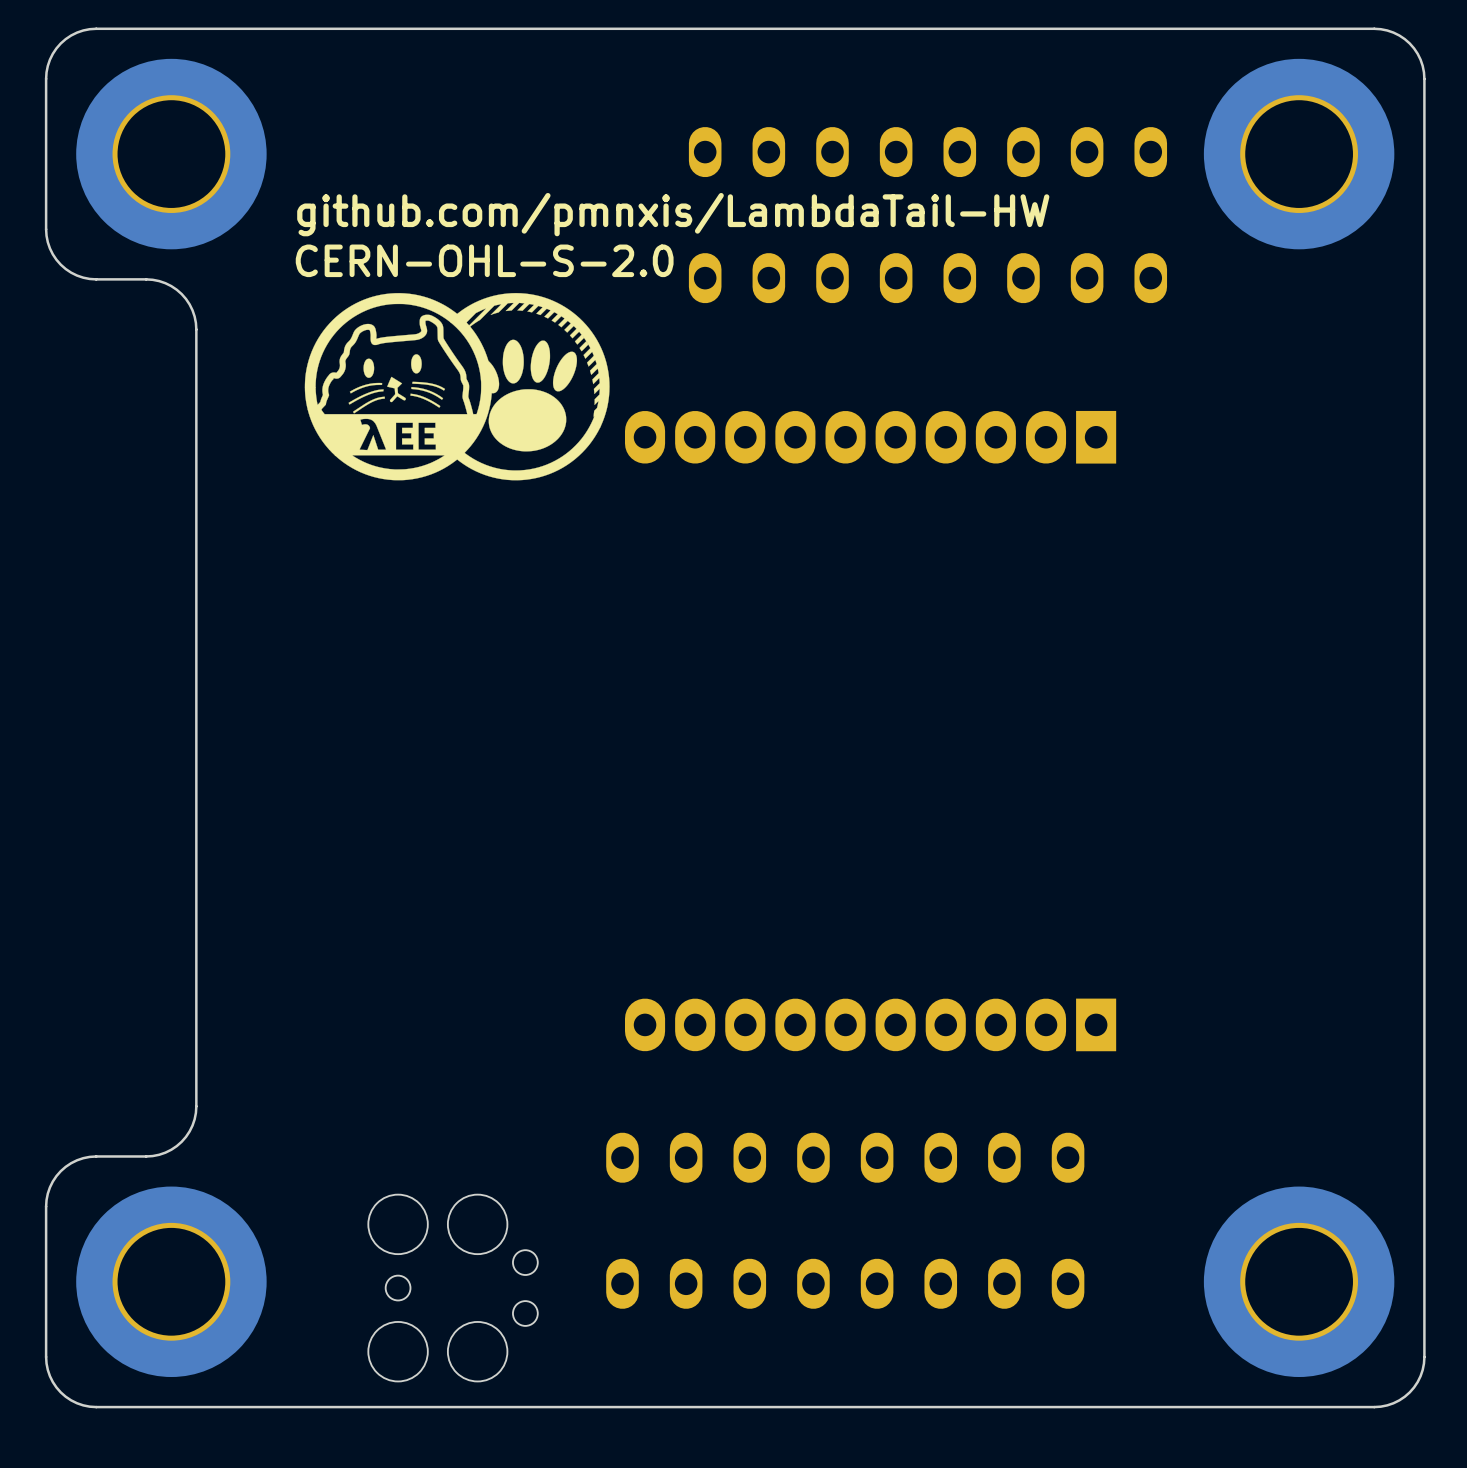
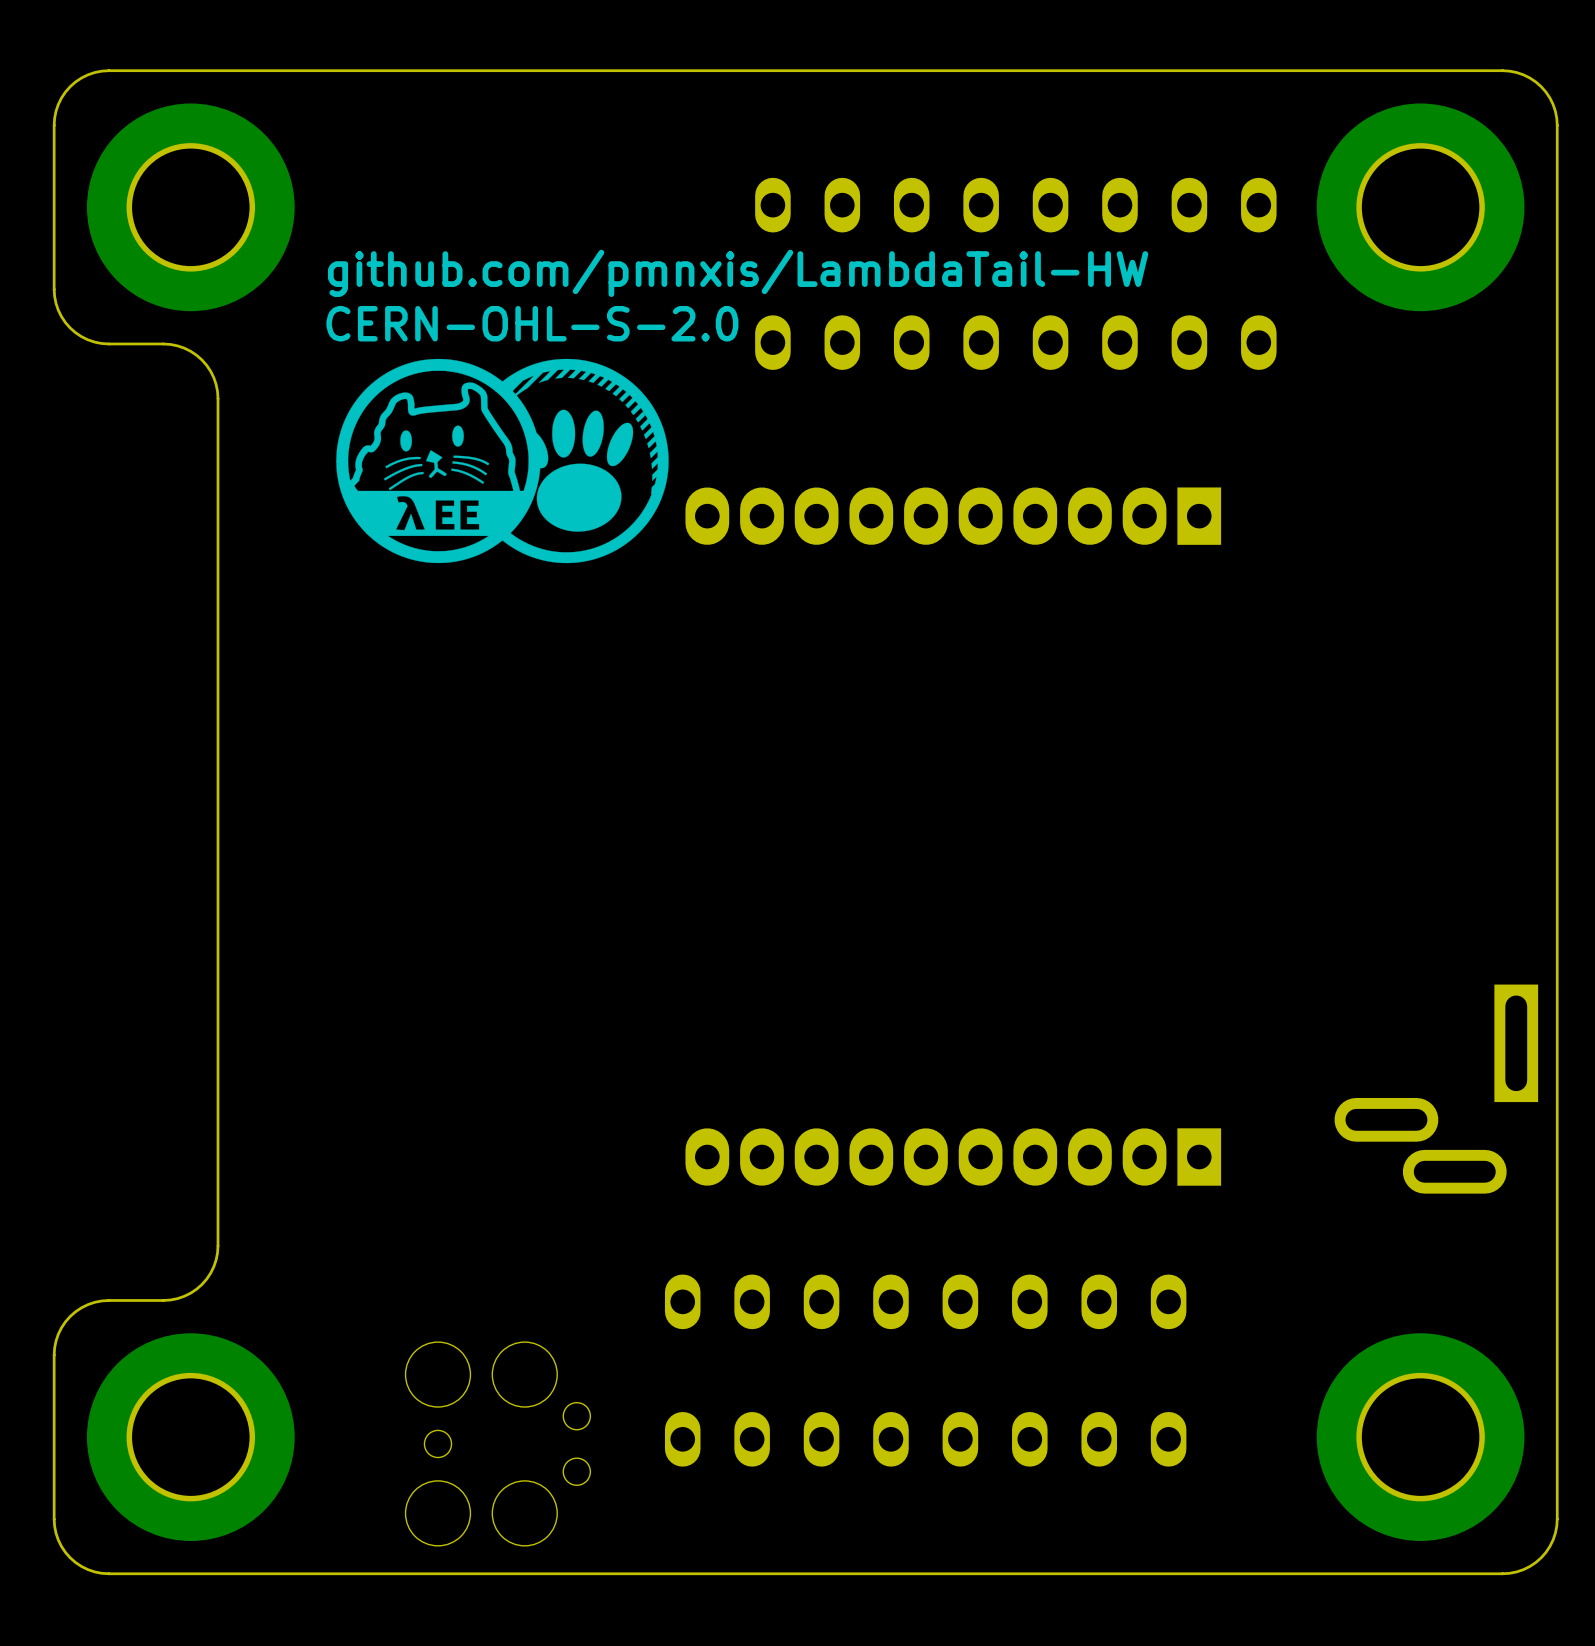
part: none -> (1436, 1089)

